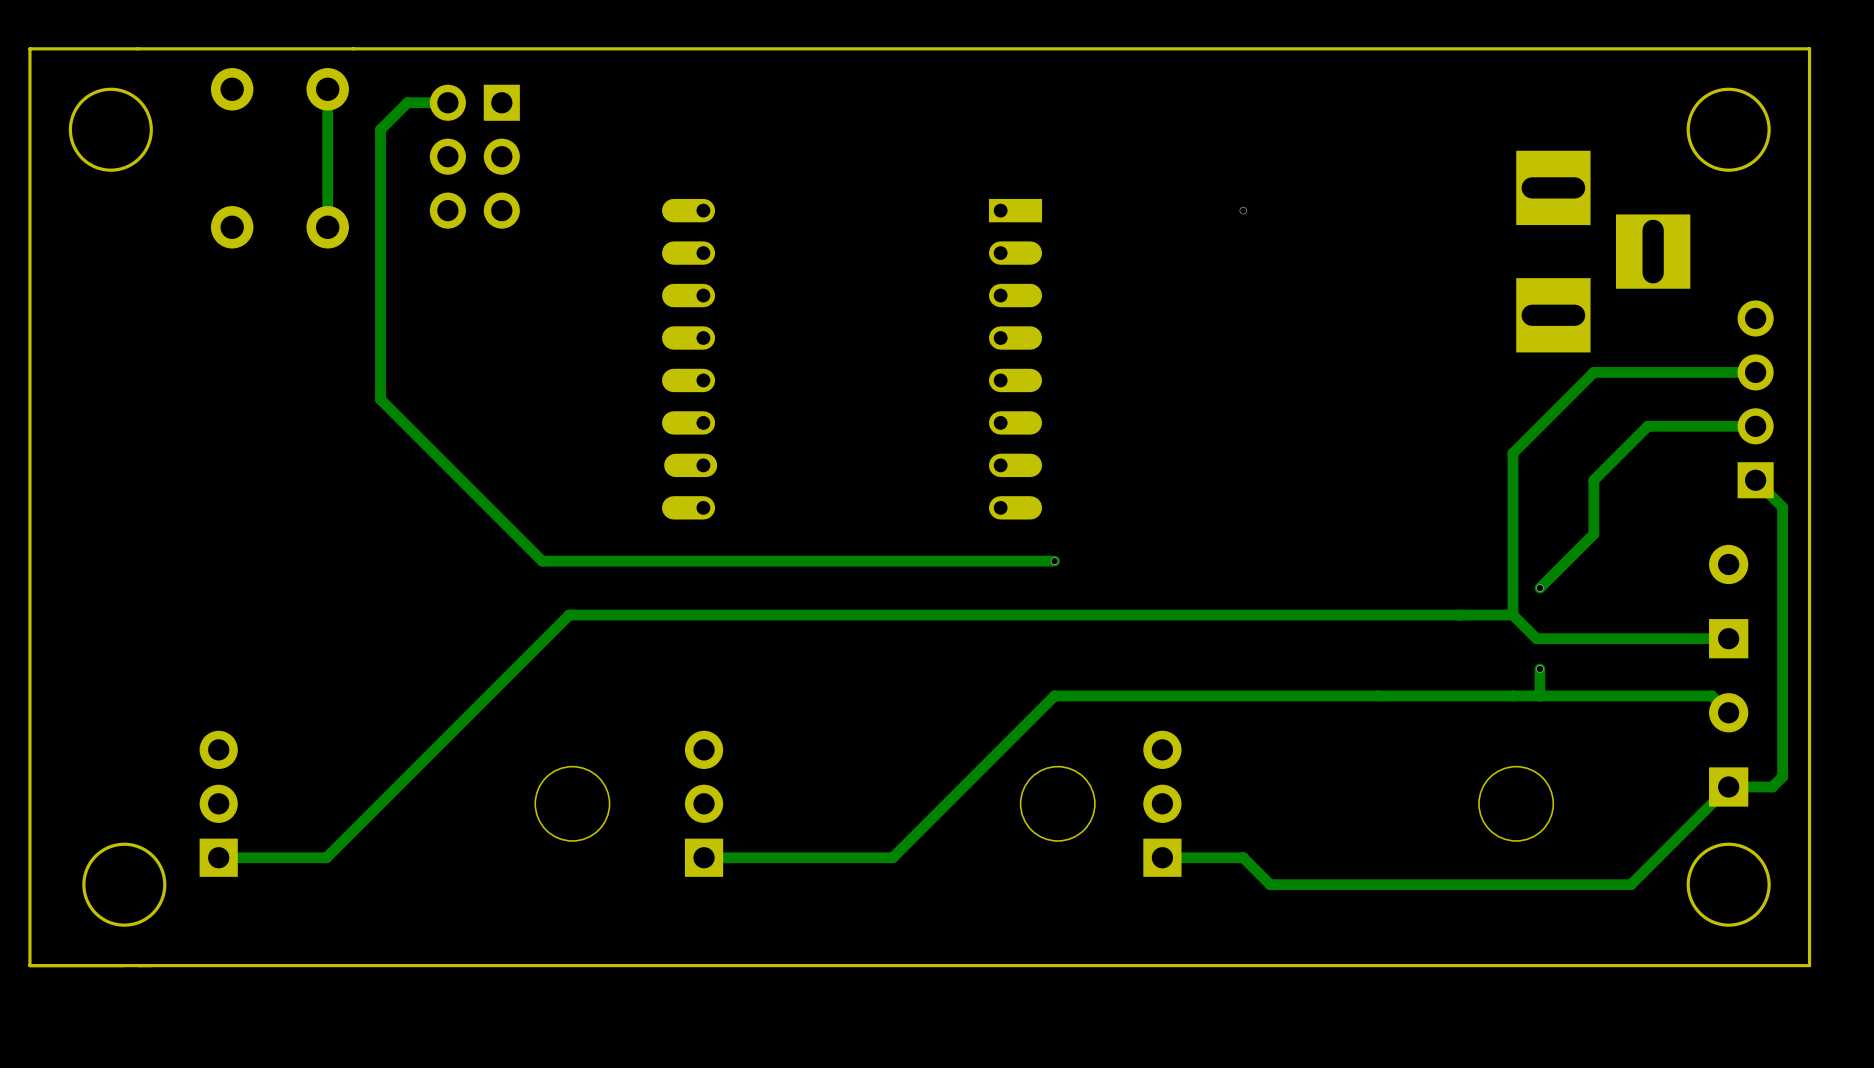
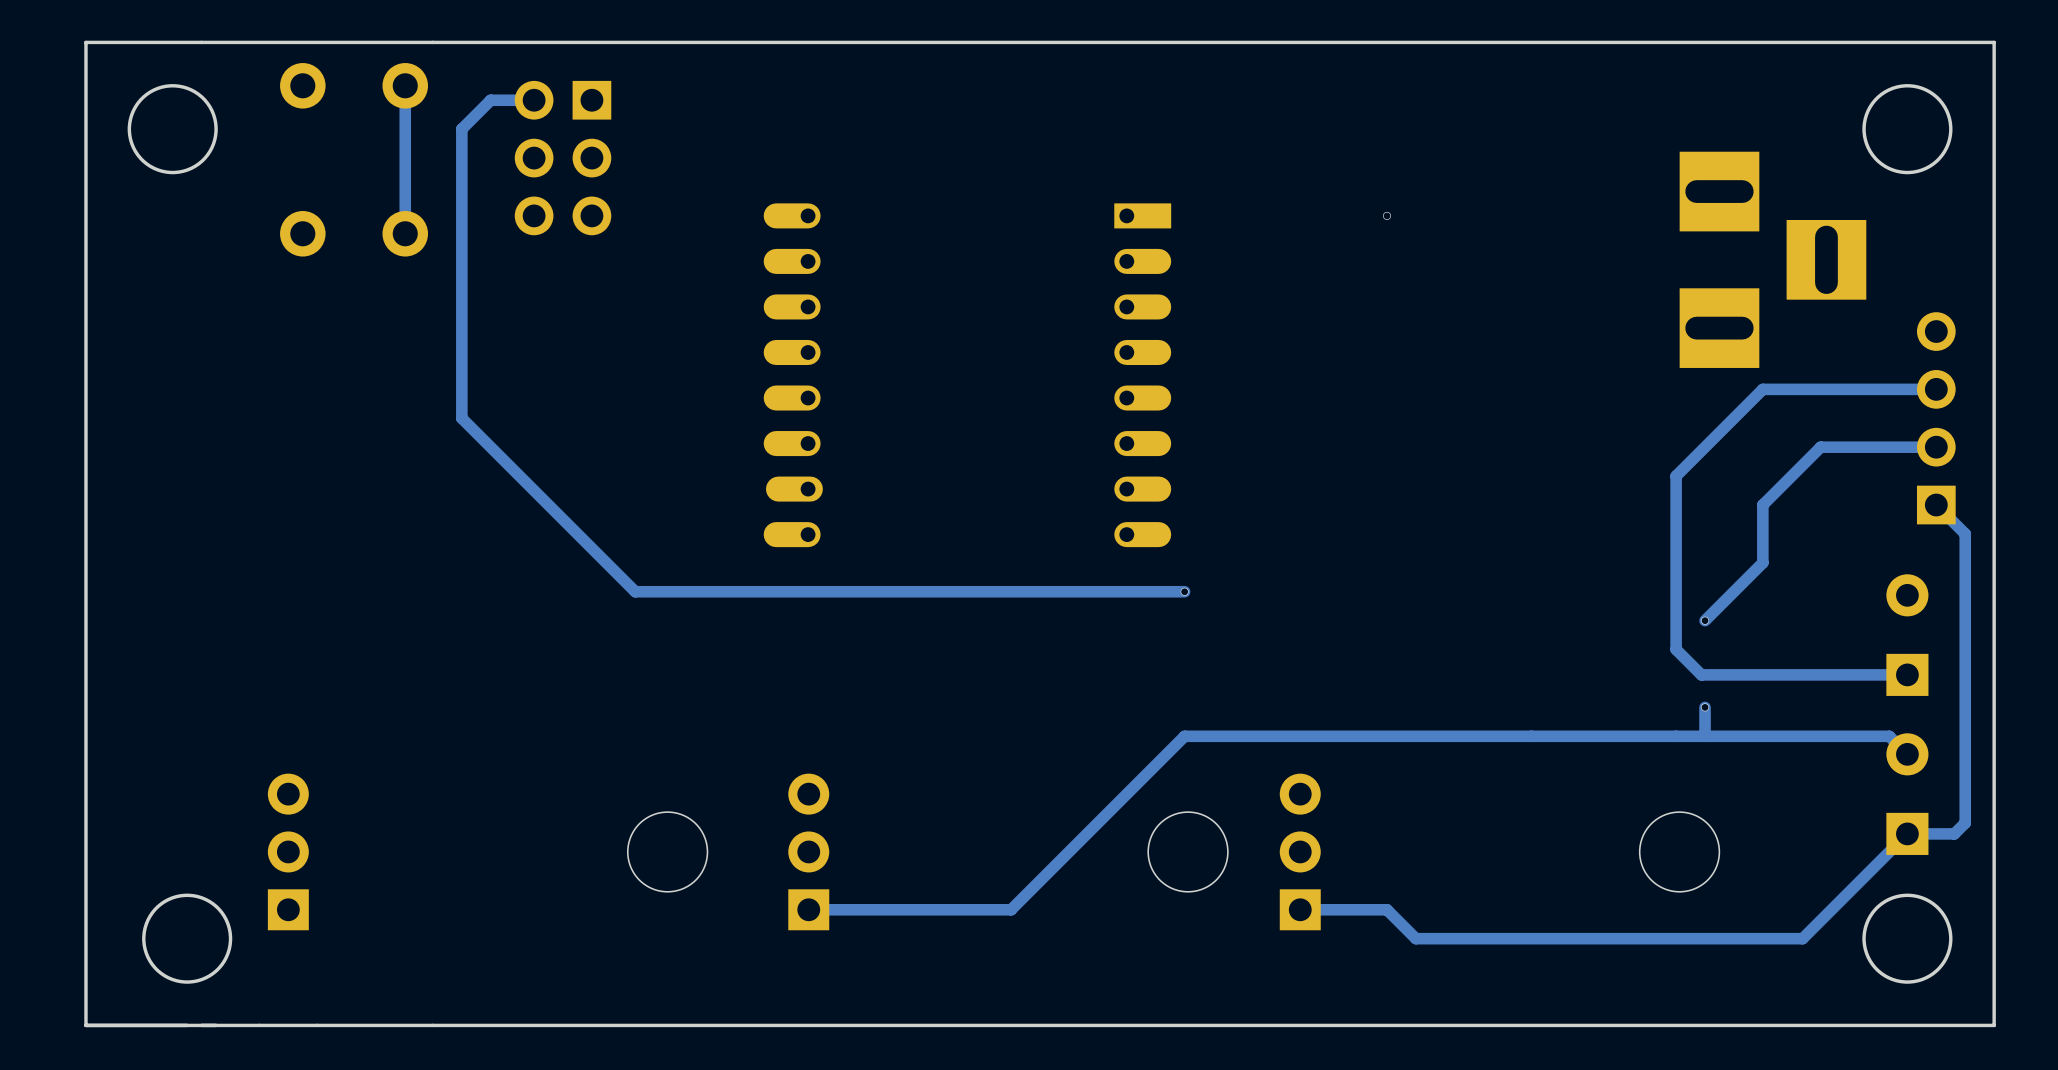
track: (1512, 615) (569, 615) (326, 857) (218, 857) -> none

